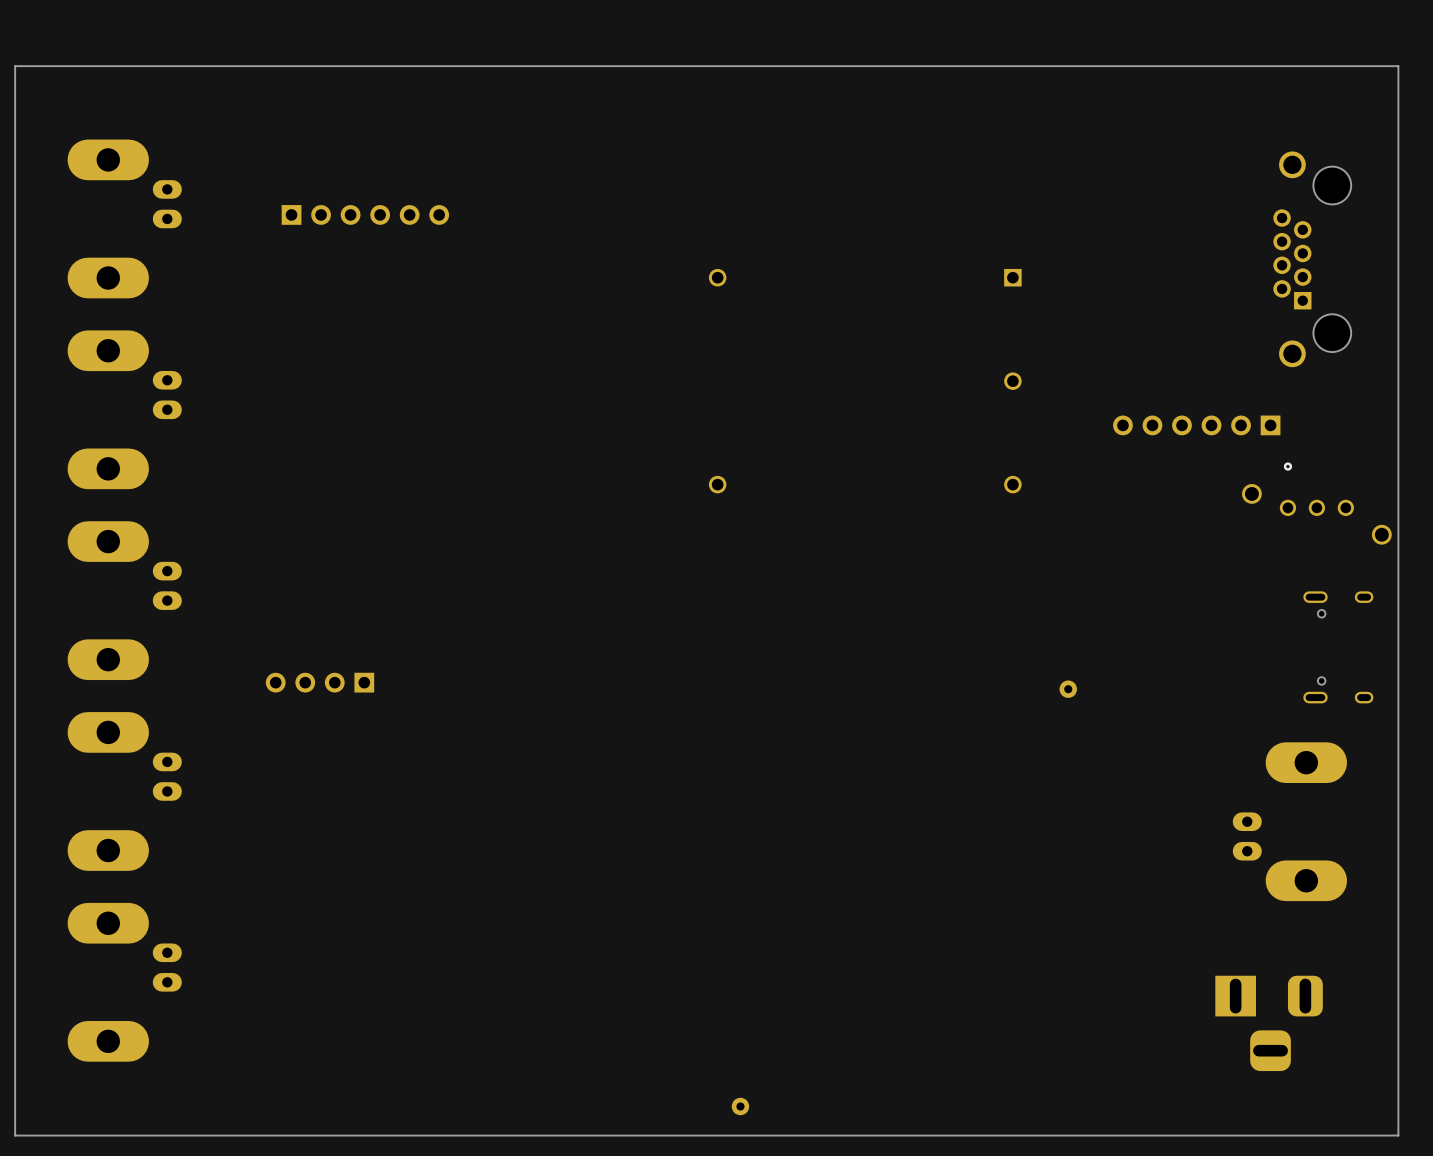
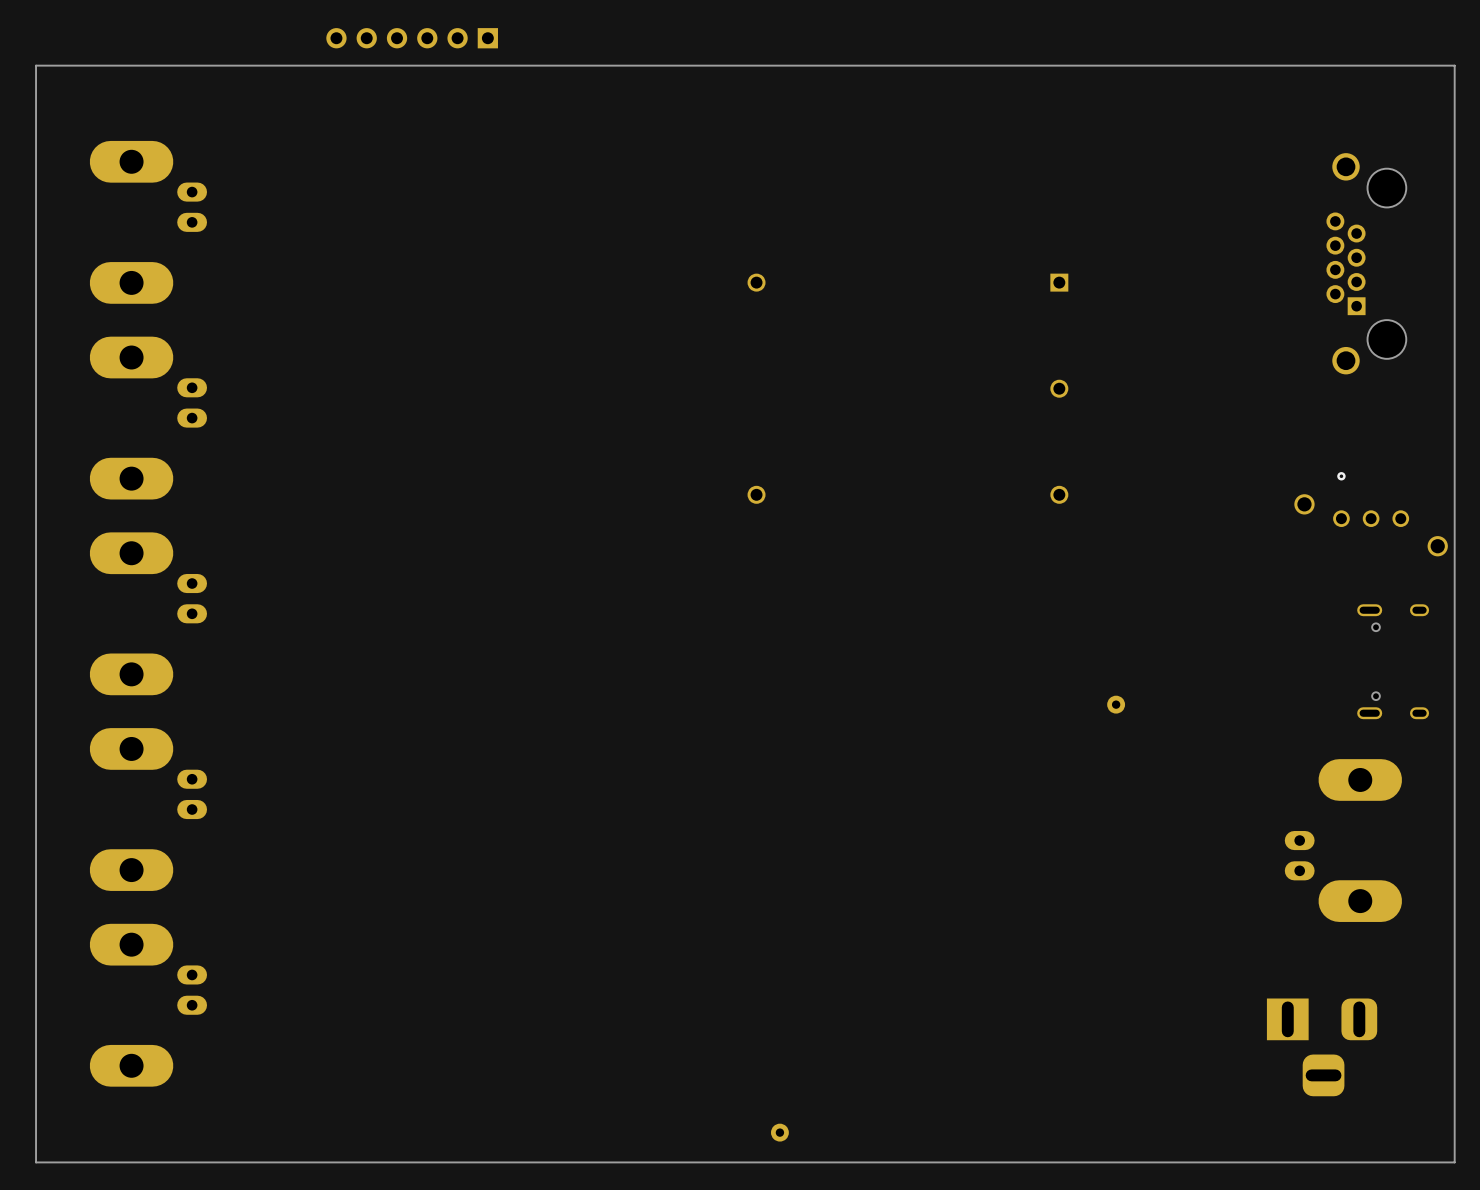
part rotation: 0° (365, 214) -> 180° (412, 38)
part position: (365, 214) -> (412, 38)
part: (1196, 425) -> none
part: (320, 682) -> none

